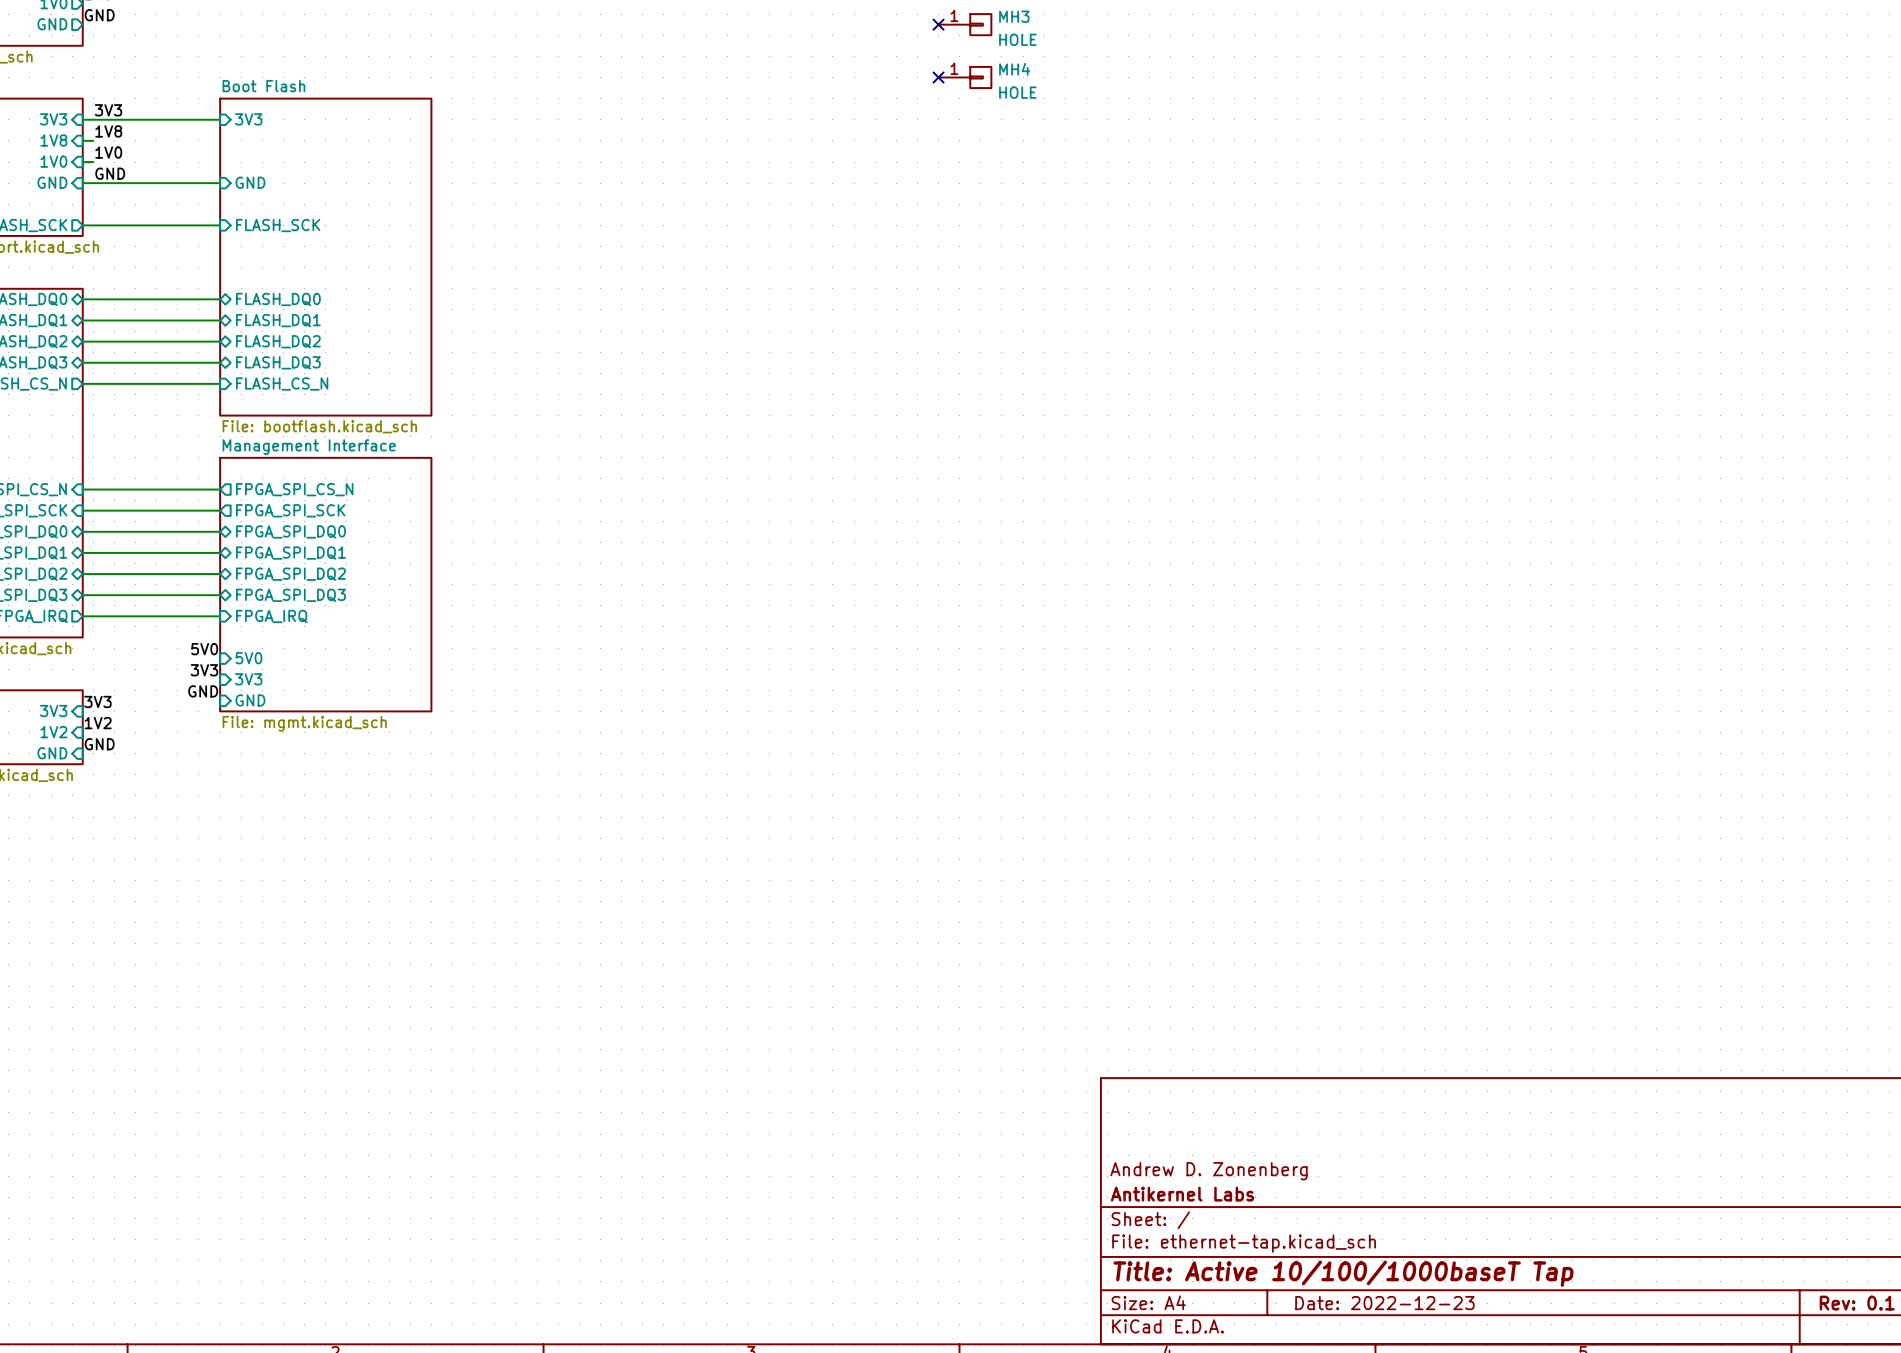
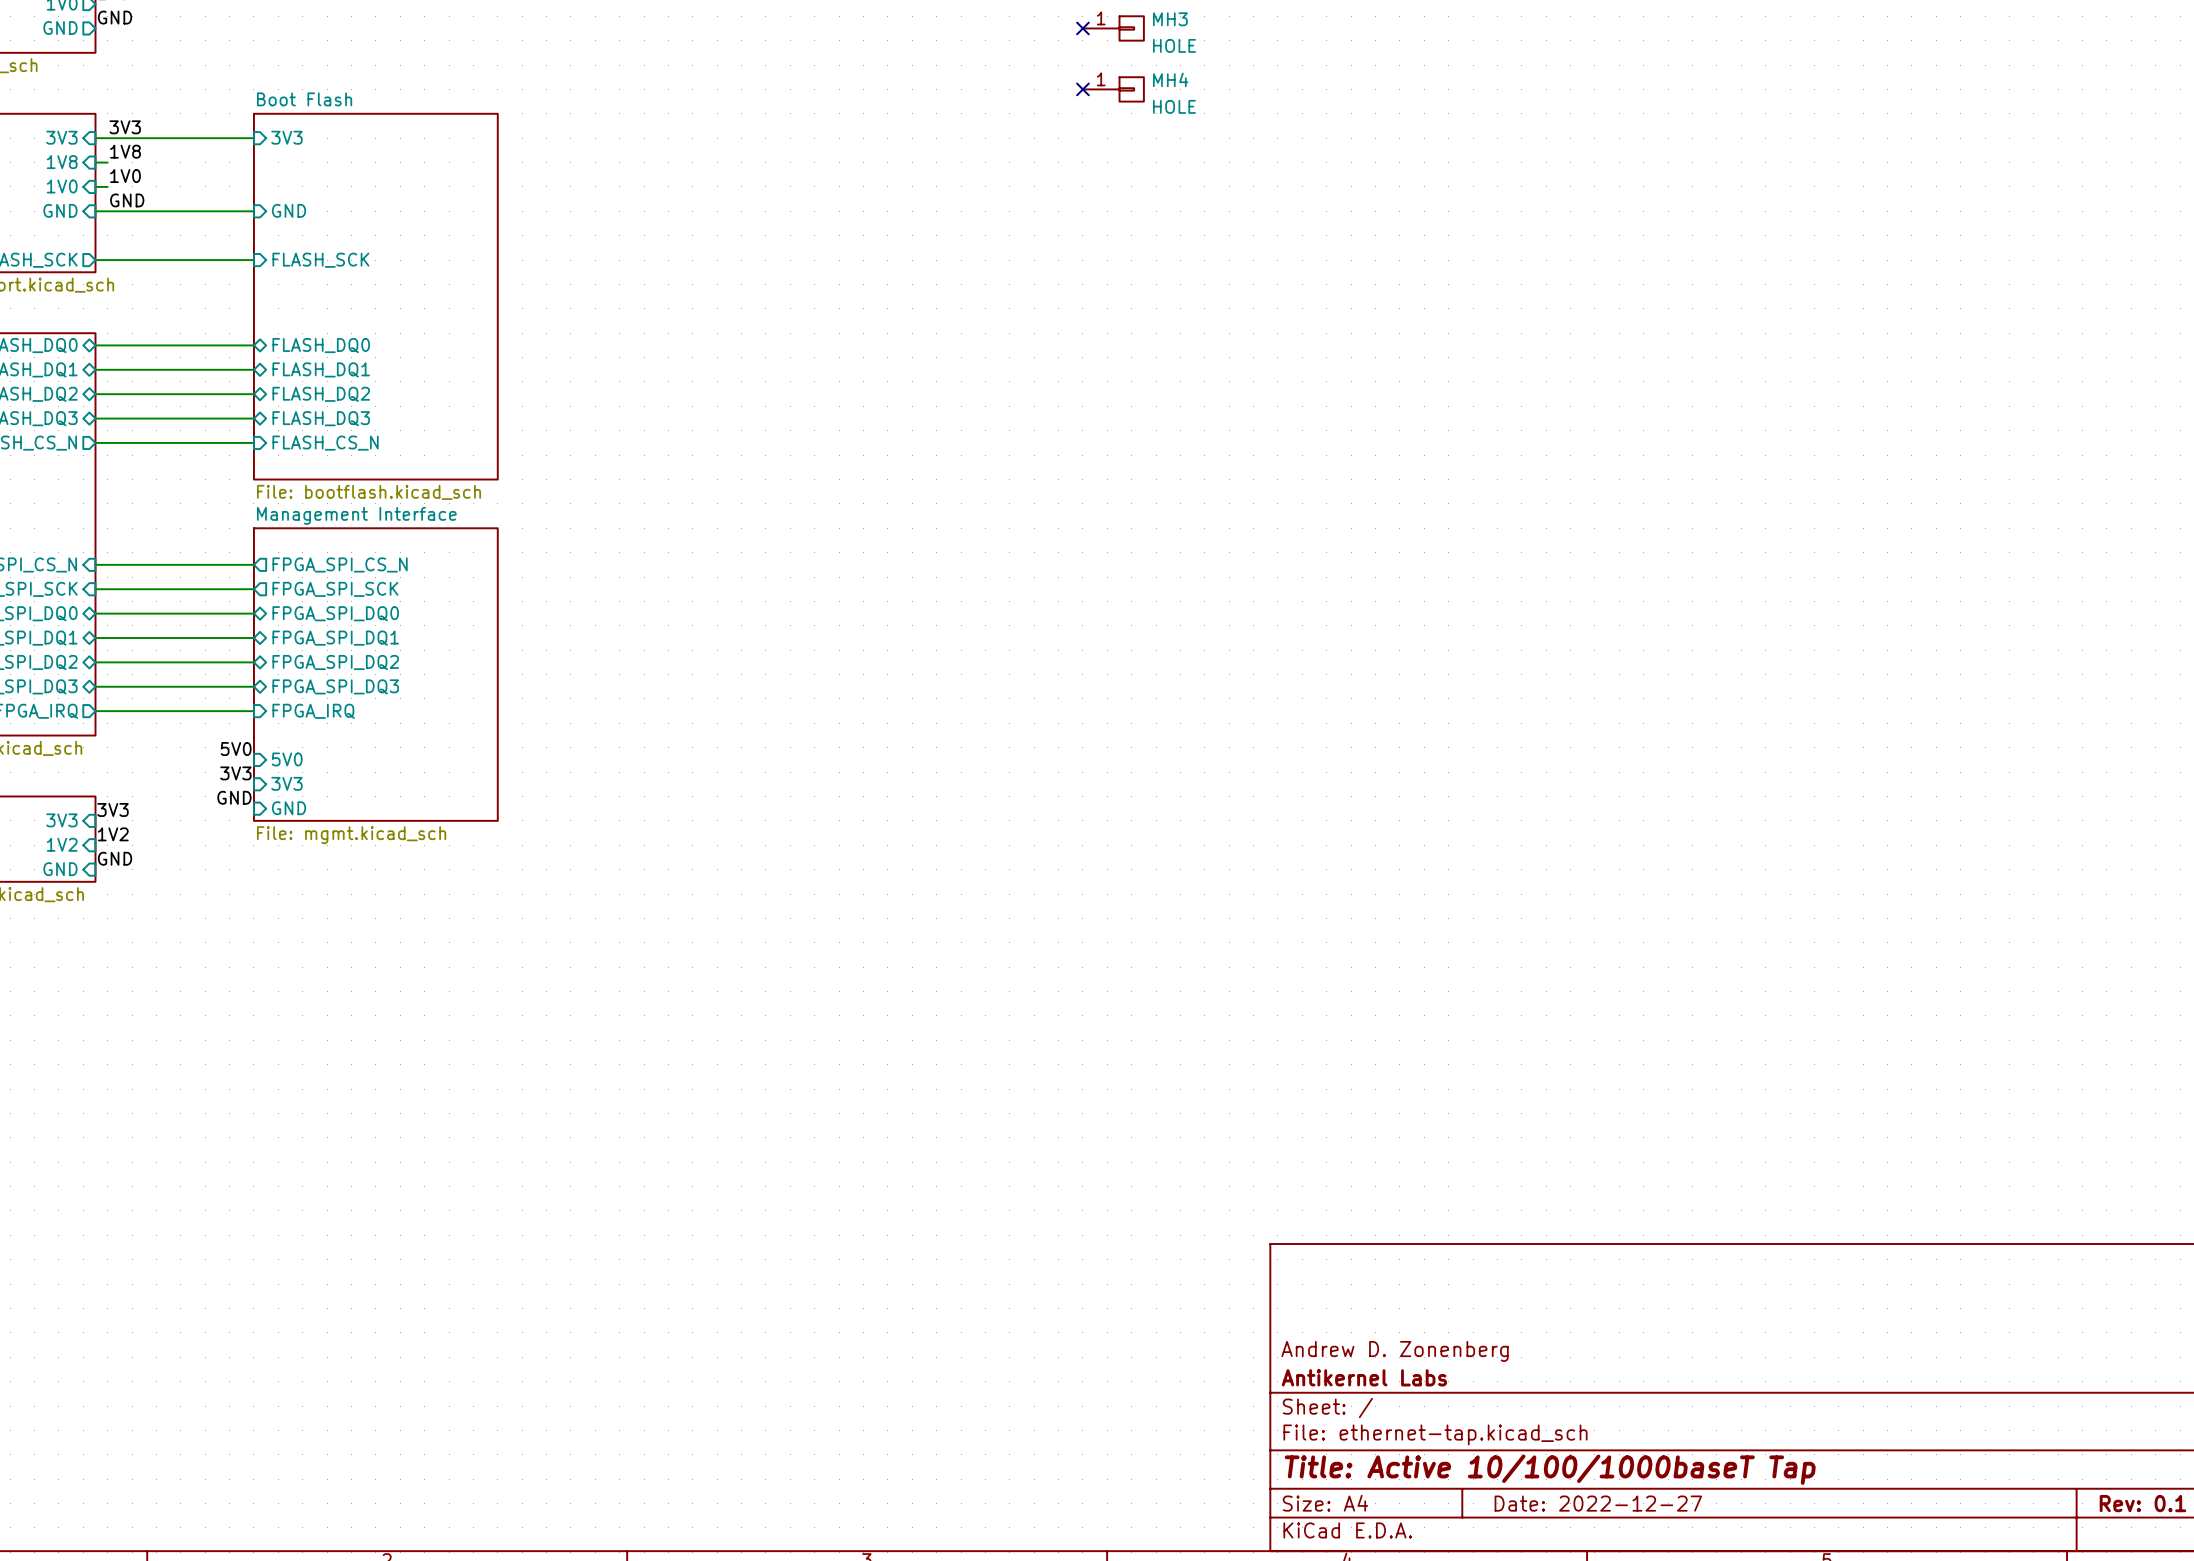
title block: Date: 2022-12-23 (1384, 1303) -> Date: 2022-12-27 (1598, 1503)

